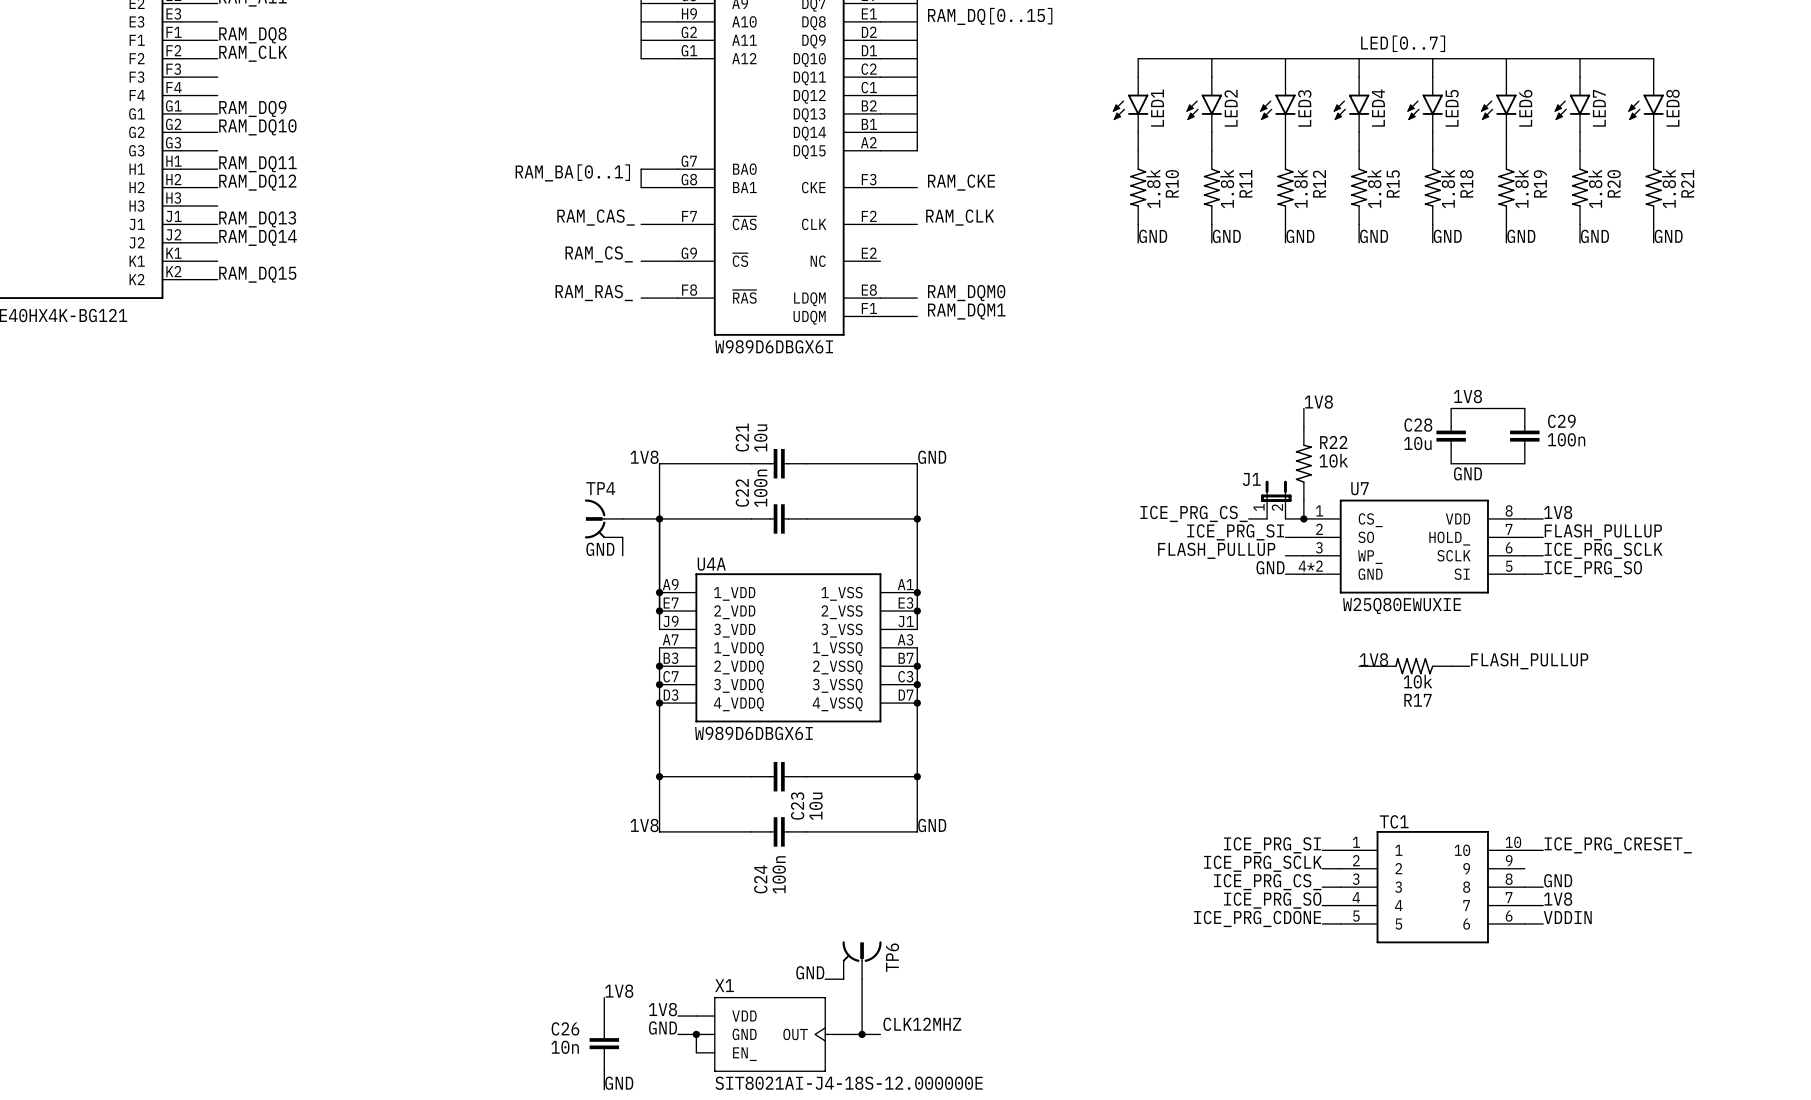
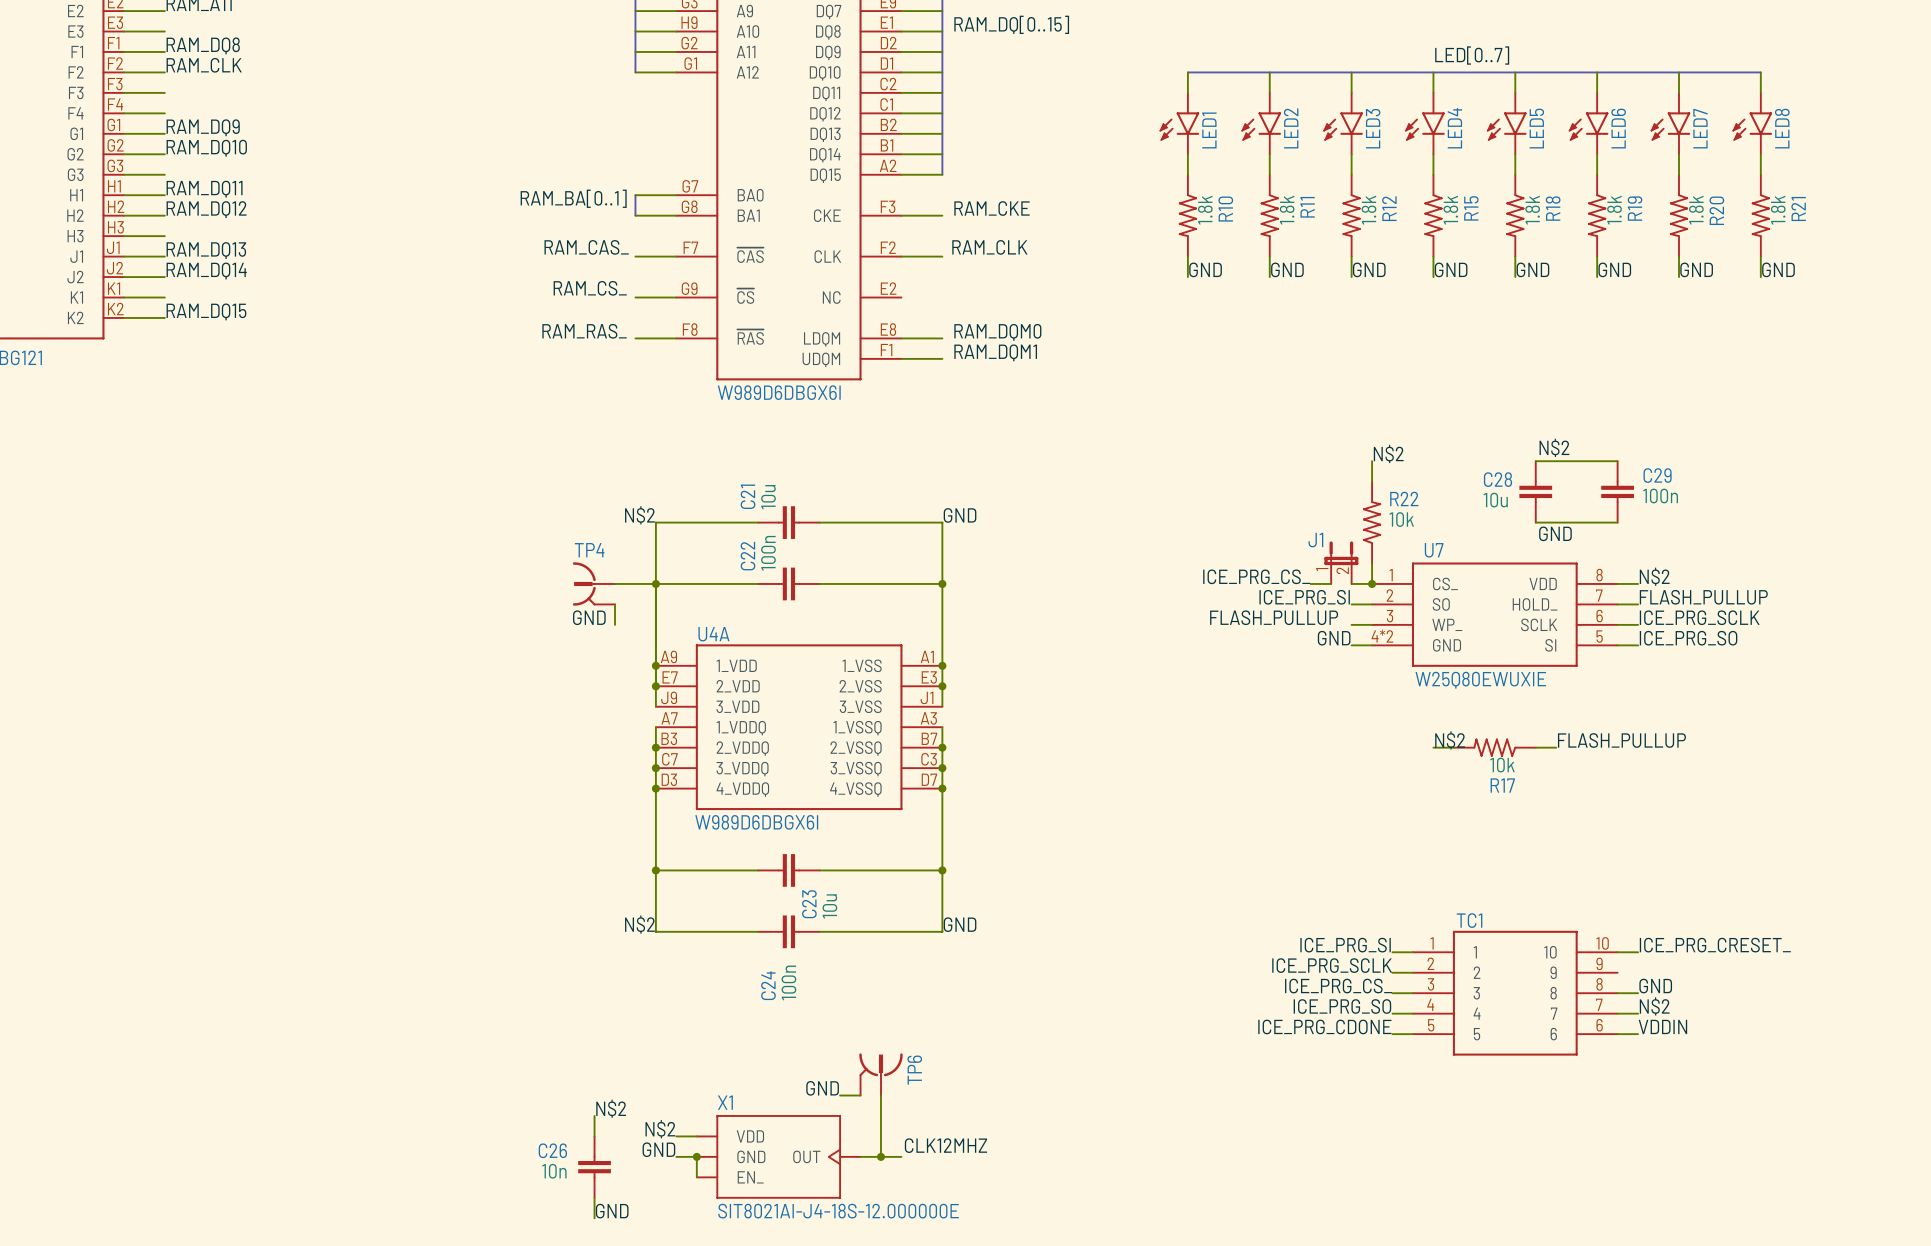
label: 1V8 (1467, 396) -> N$2 (1554, 447)
label: 1V8 (1318, 402) -> N$2 (1388, 453)
label: 1V8 (644, 457) -> N$2 (639, 515)
label: 1V8 (1558, 512) -> N$2 (1654, 576)
label: 1V8 (1374, 659) -> N$2 (1450, 740)
label: 1V8 (644, 825) -> N$2 (639, 924)
label: 1V8 (1558, 899) -> N$2 (1654, 1006)
label: 1V8 (619, 991) -> N$2 (611, 1108)
label: 1V8 (662, 1009) -> N$2 (660, 1129)

